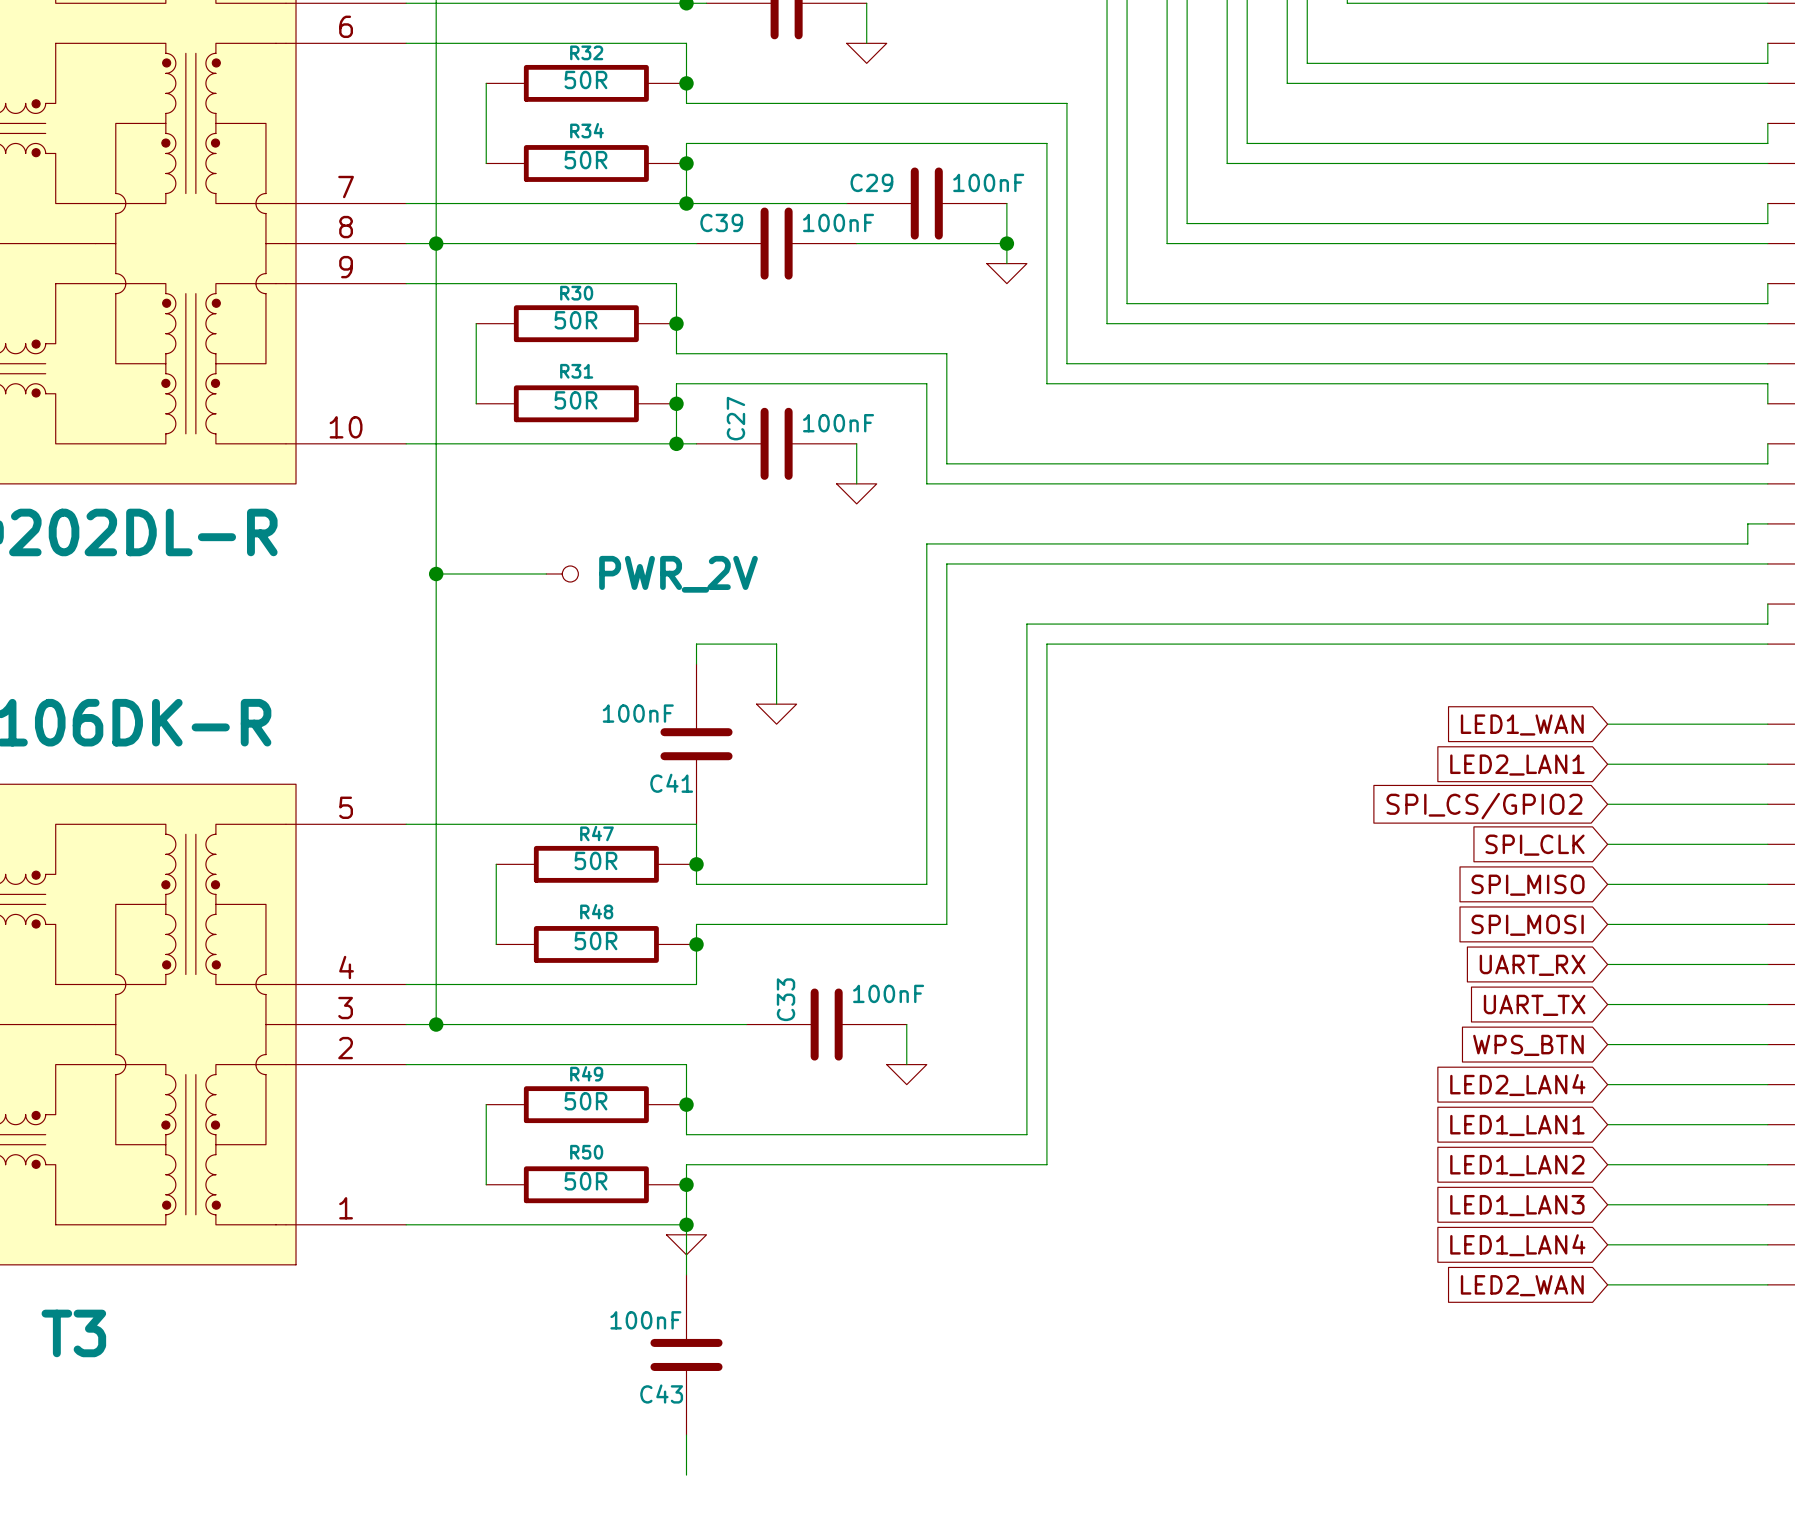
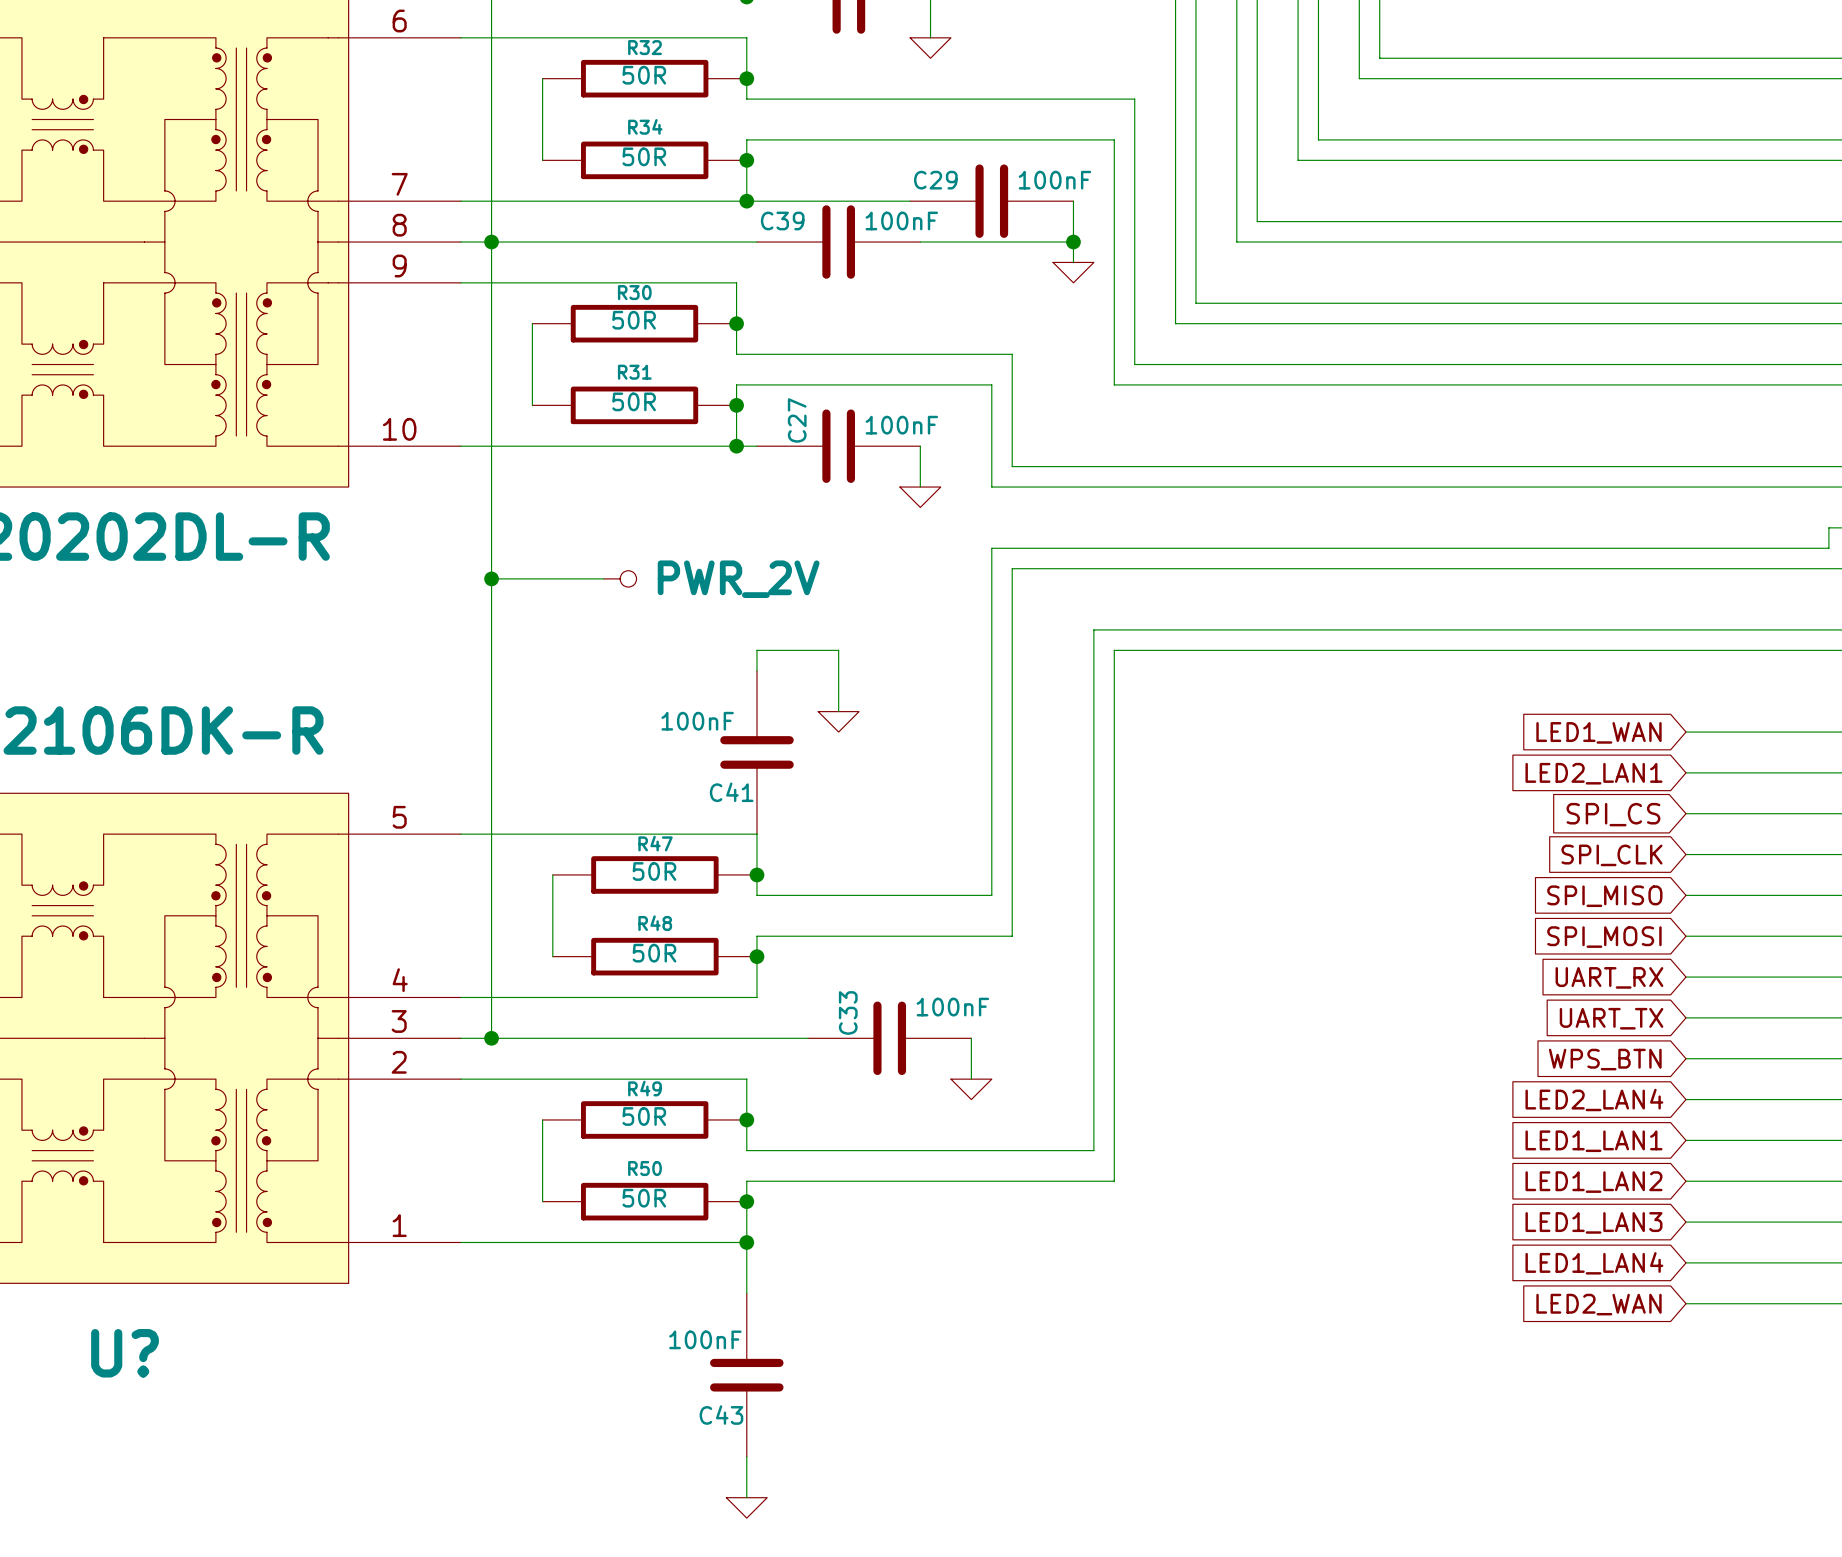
global label: SPI_CS/GPIO2 (1484, 806) -> SPI_CS (1613, 814)
power symbol position: (686, 1244) -> (746, 1507)
T3 name: T3 (73, 1333) -> U? (125, 1353)

